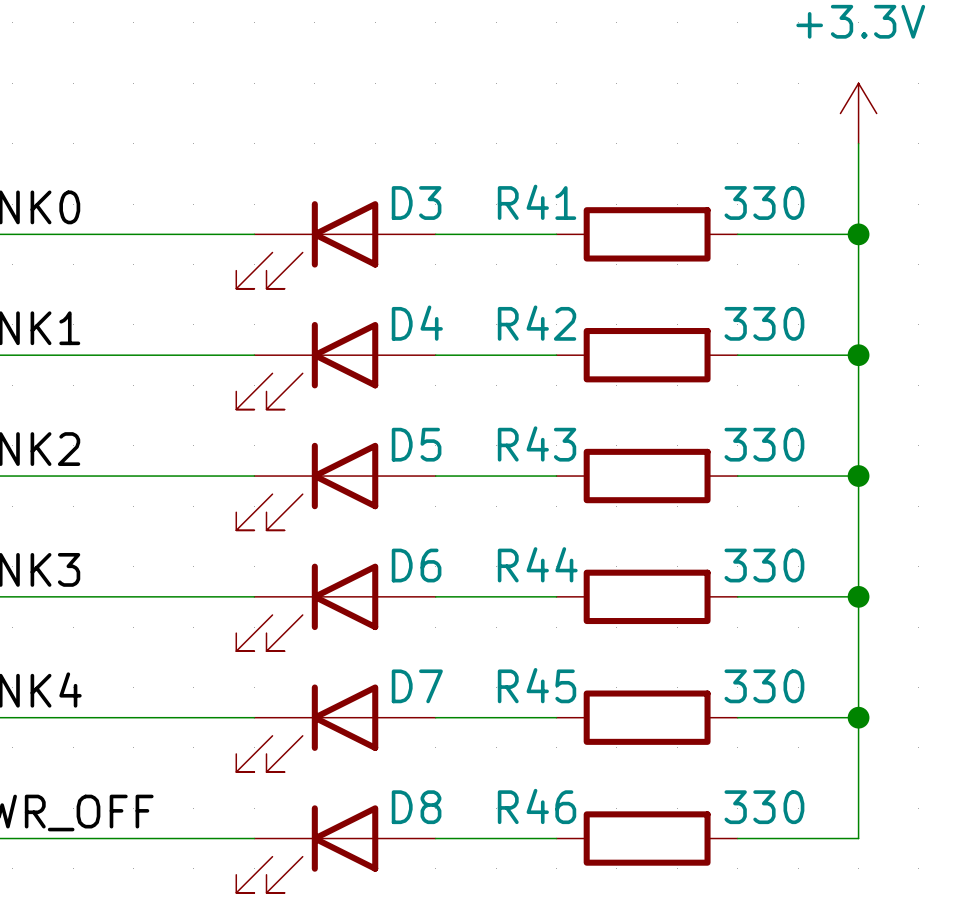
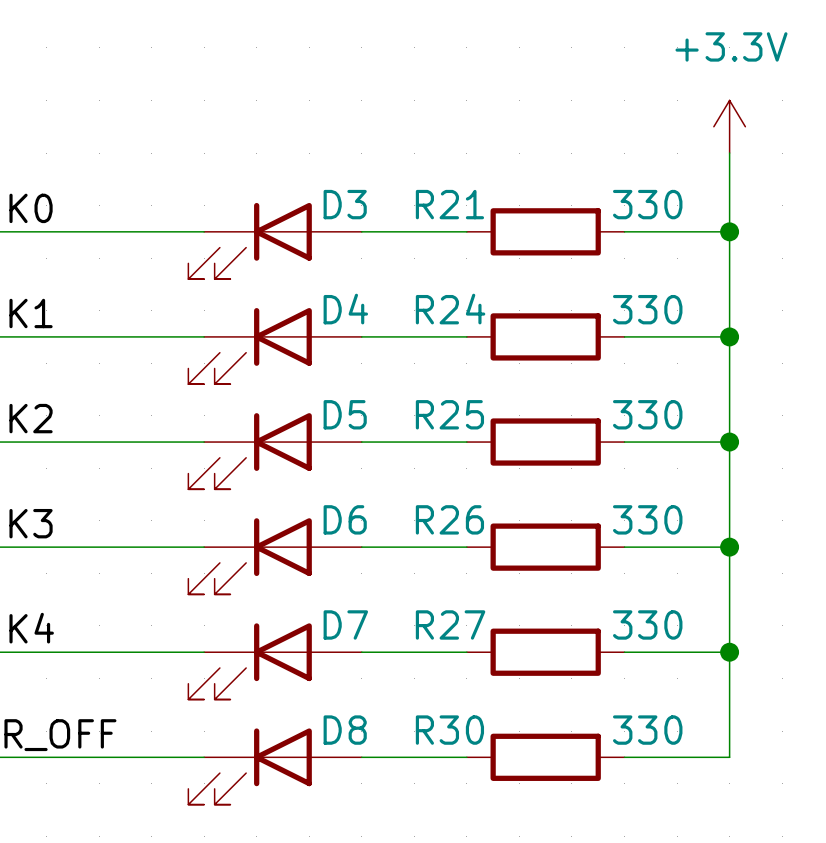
R41 name: R41 (537, 202) -> R21 (449, 204)
R42 name: R42 (537, 323) -> R24 (450, 309)
R43 name: R43 (537, 443) -> R25 (449, 414)
R44 name: R44 (537, 564) -> R26 (449, 519)
R45 name: R45 (537, 685) -> R27 (450, 624)
R46 name: R46 (537, 806) -> R30 (449, 730)

